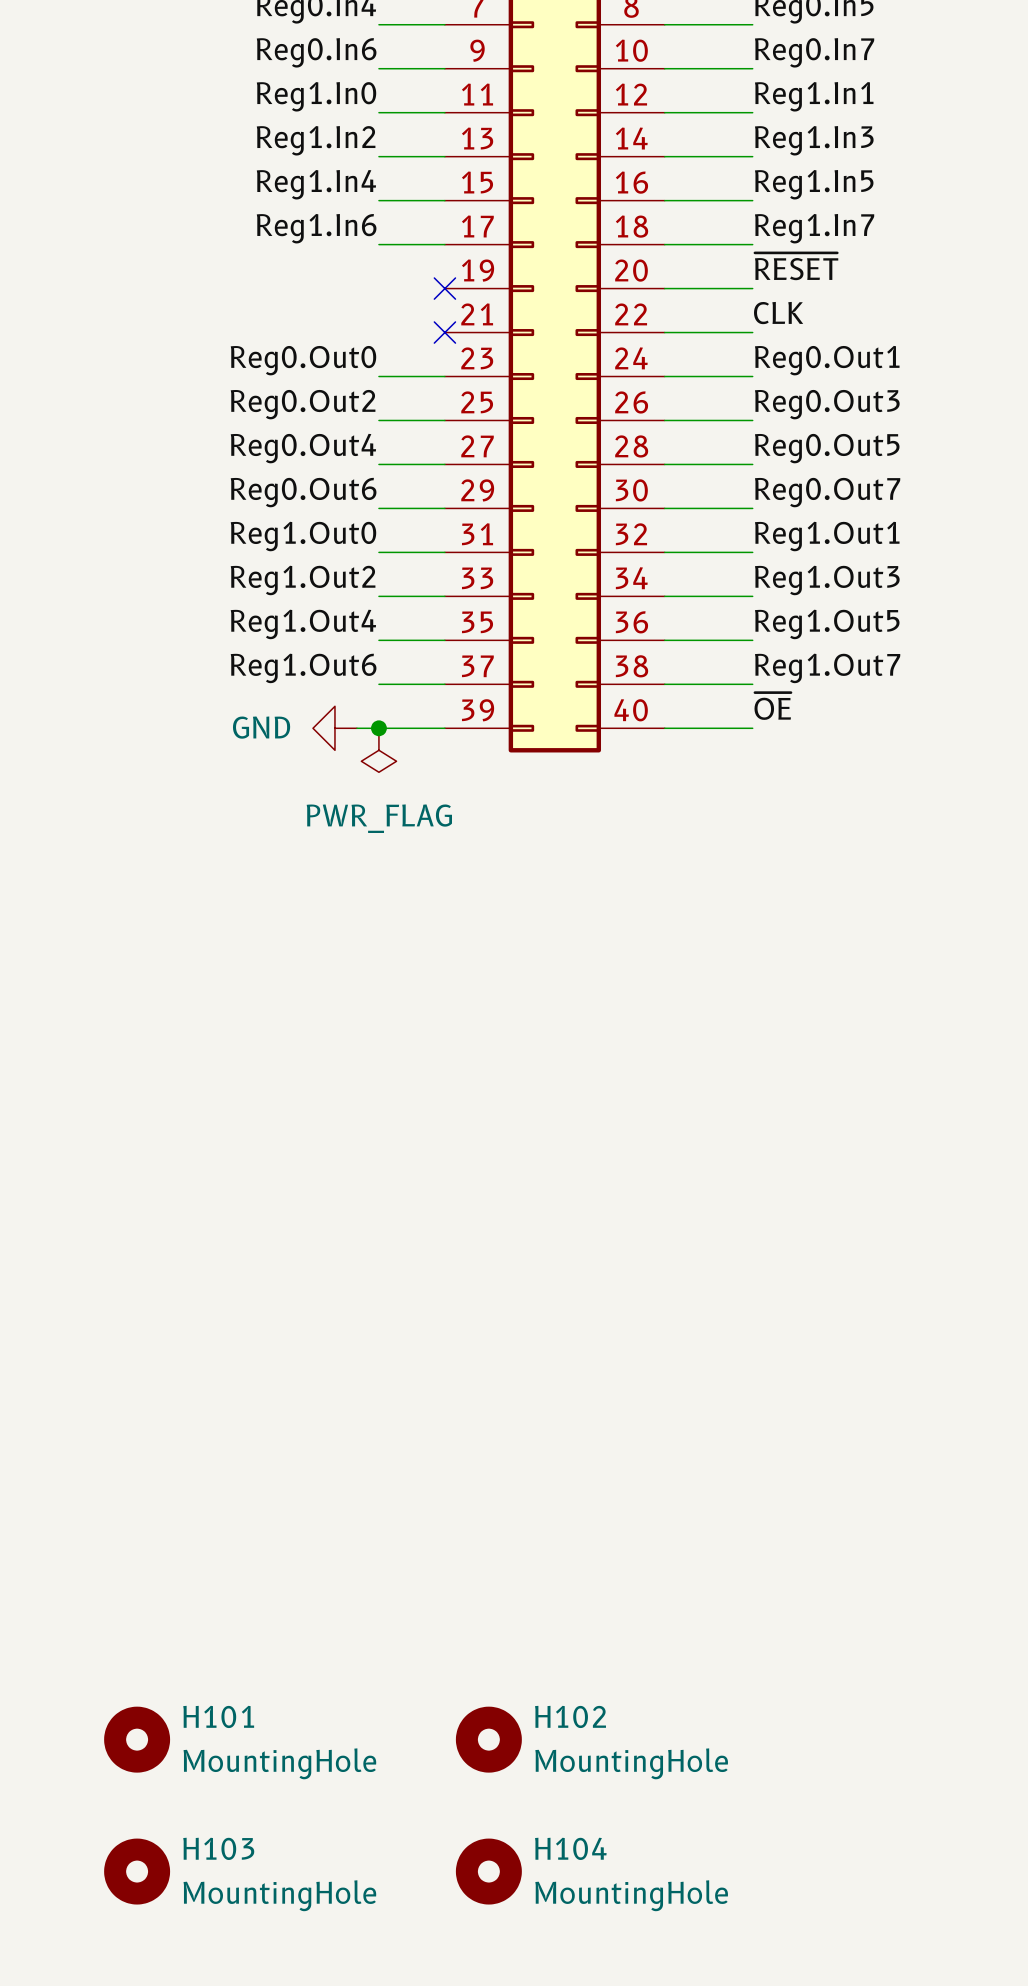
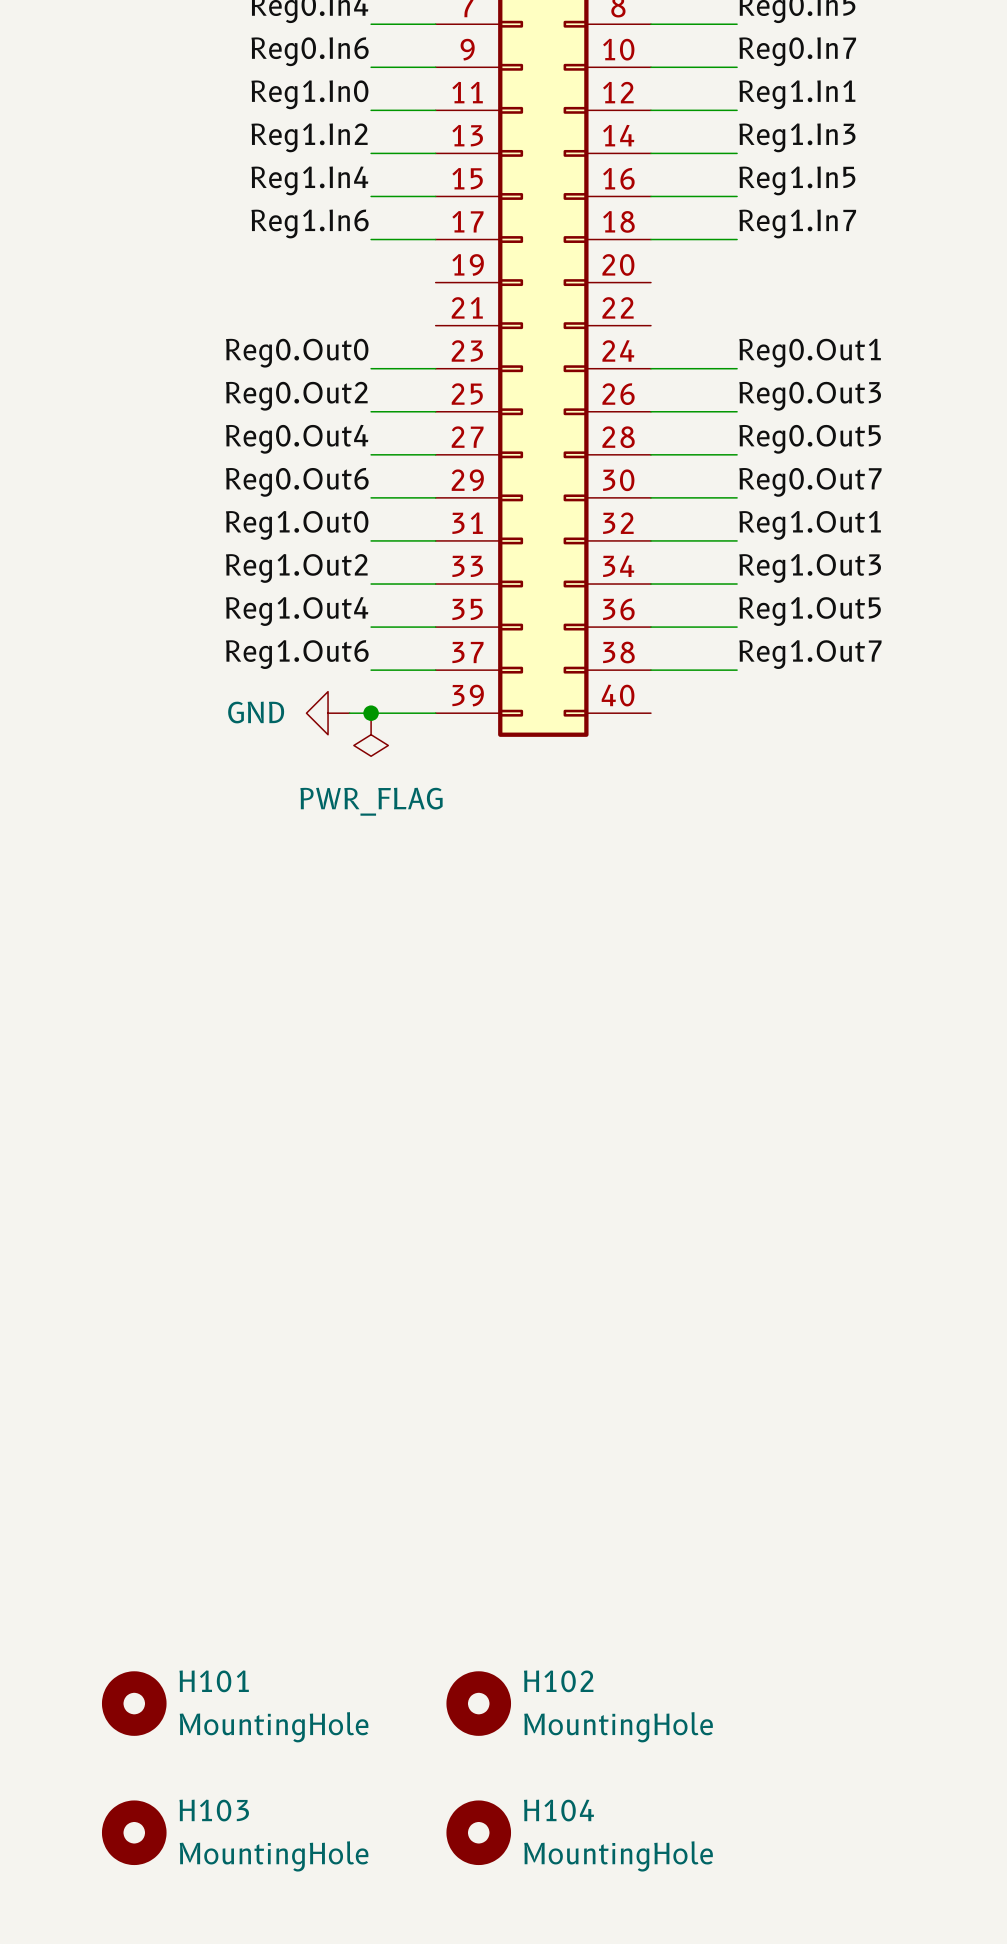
label: ~{RESET} (796, 266) -> none
no-connect mark: (444, 288) -> none
wire: (664, 288) (752, 288) -> none
label: CLK (778, 313) -> none
no-connect mark: (444, 332) -> none
wire: (664, 332) (752, 332) -> none
label: ~{OE} (772, 706) -> none
wire: (664, 728) (752, 728) -> none

